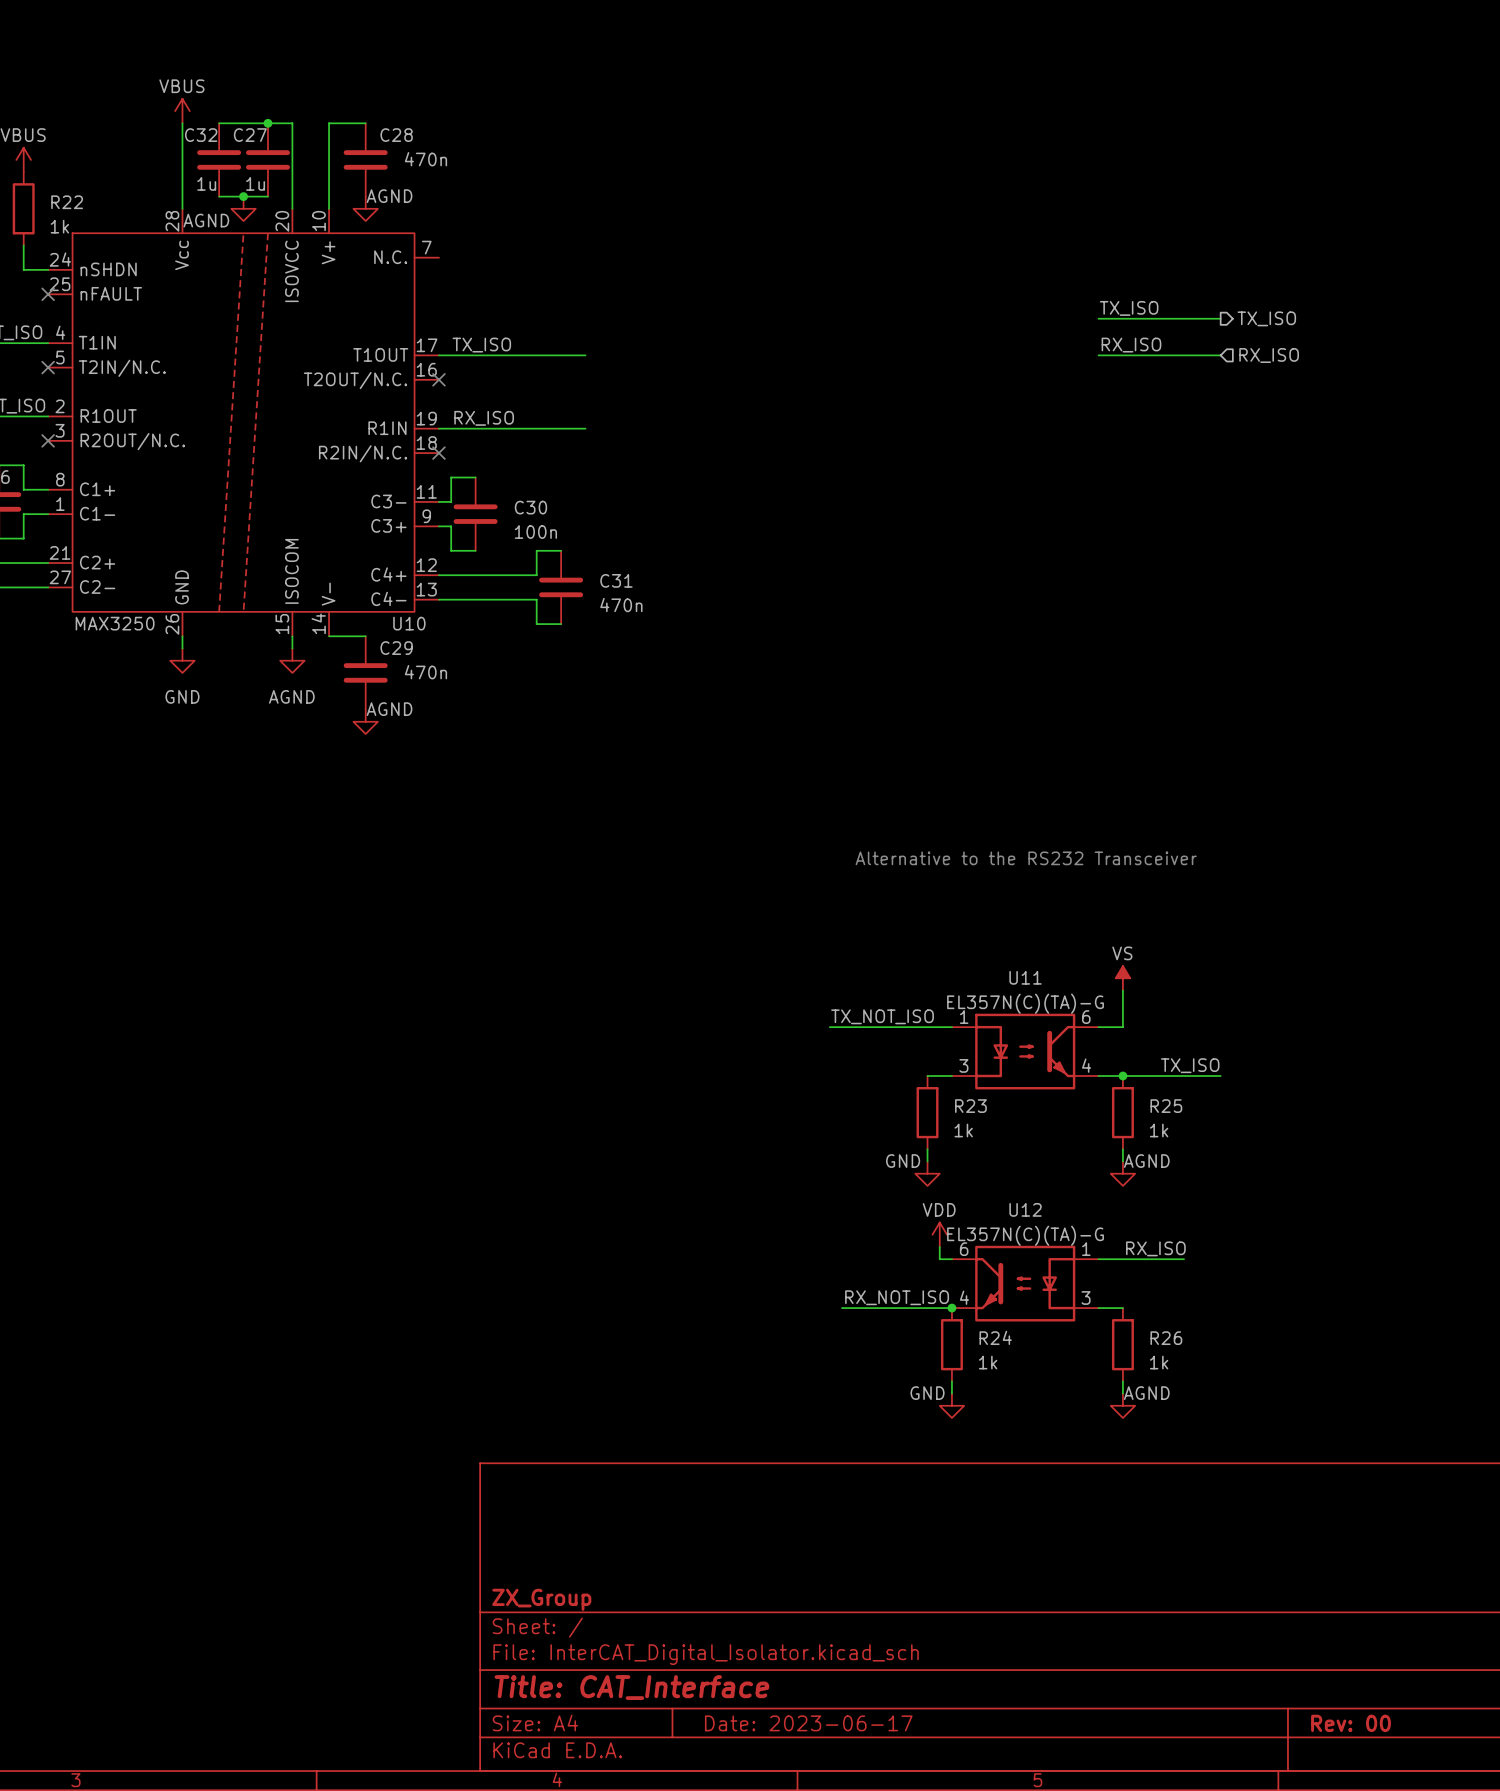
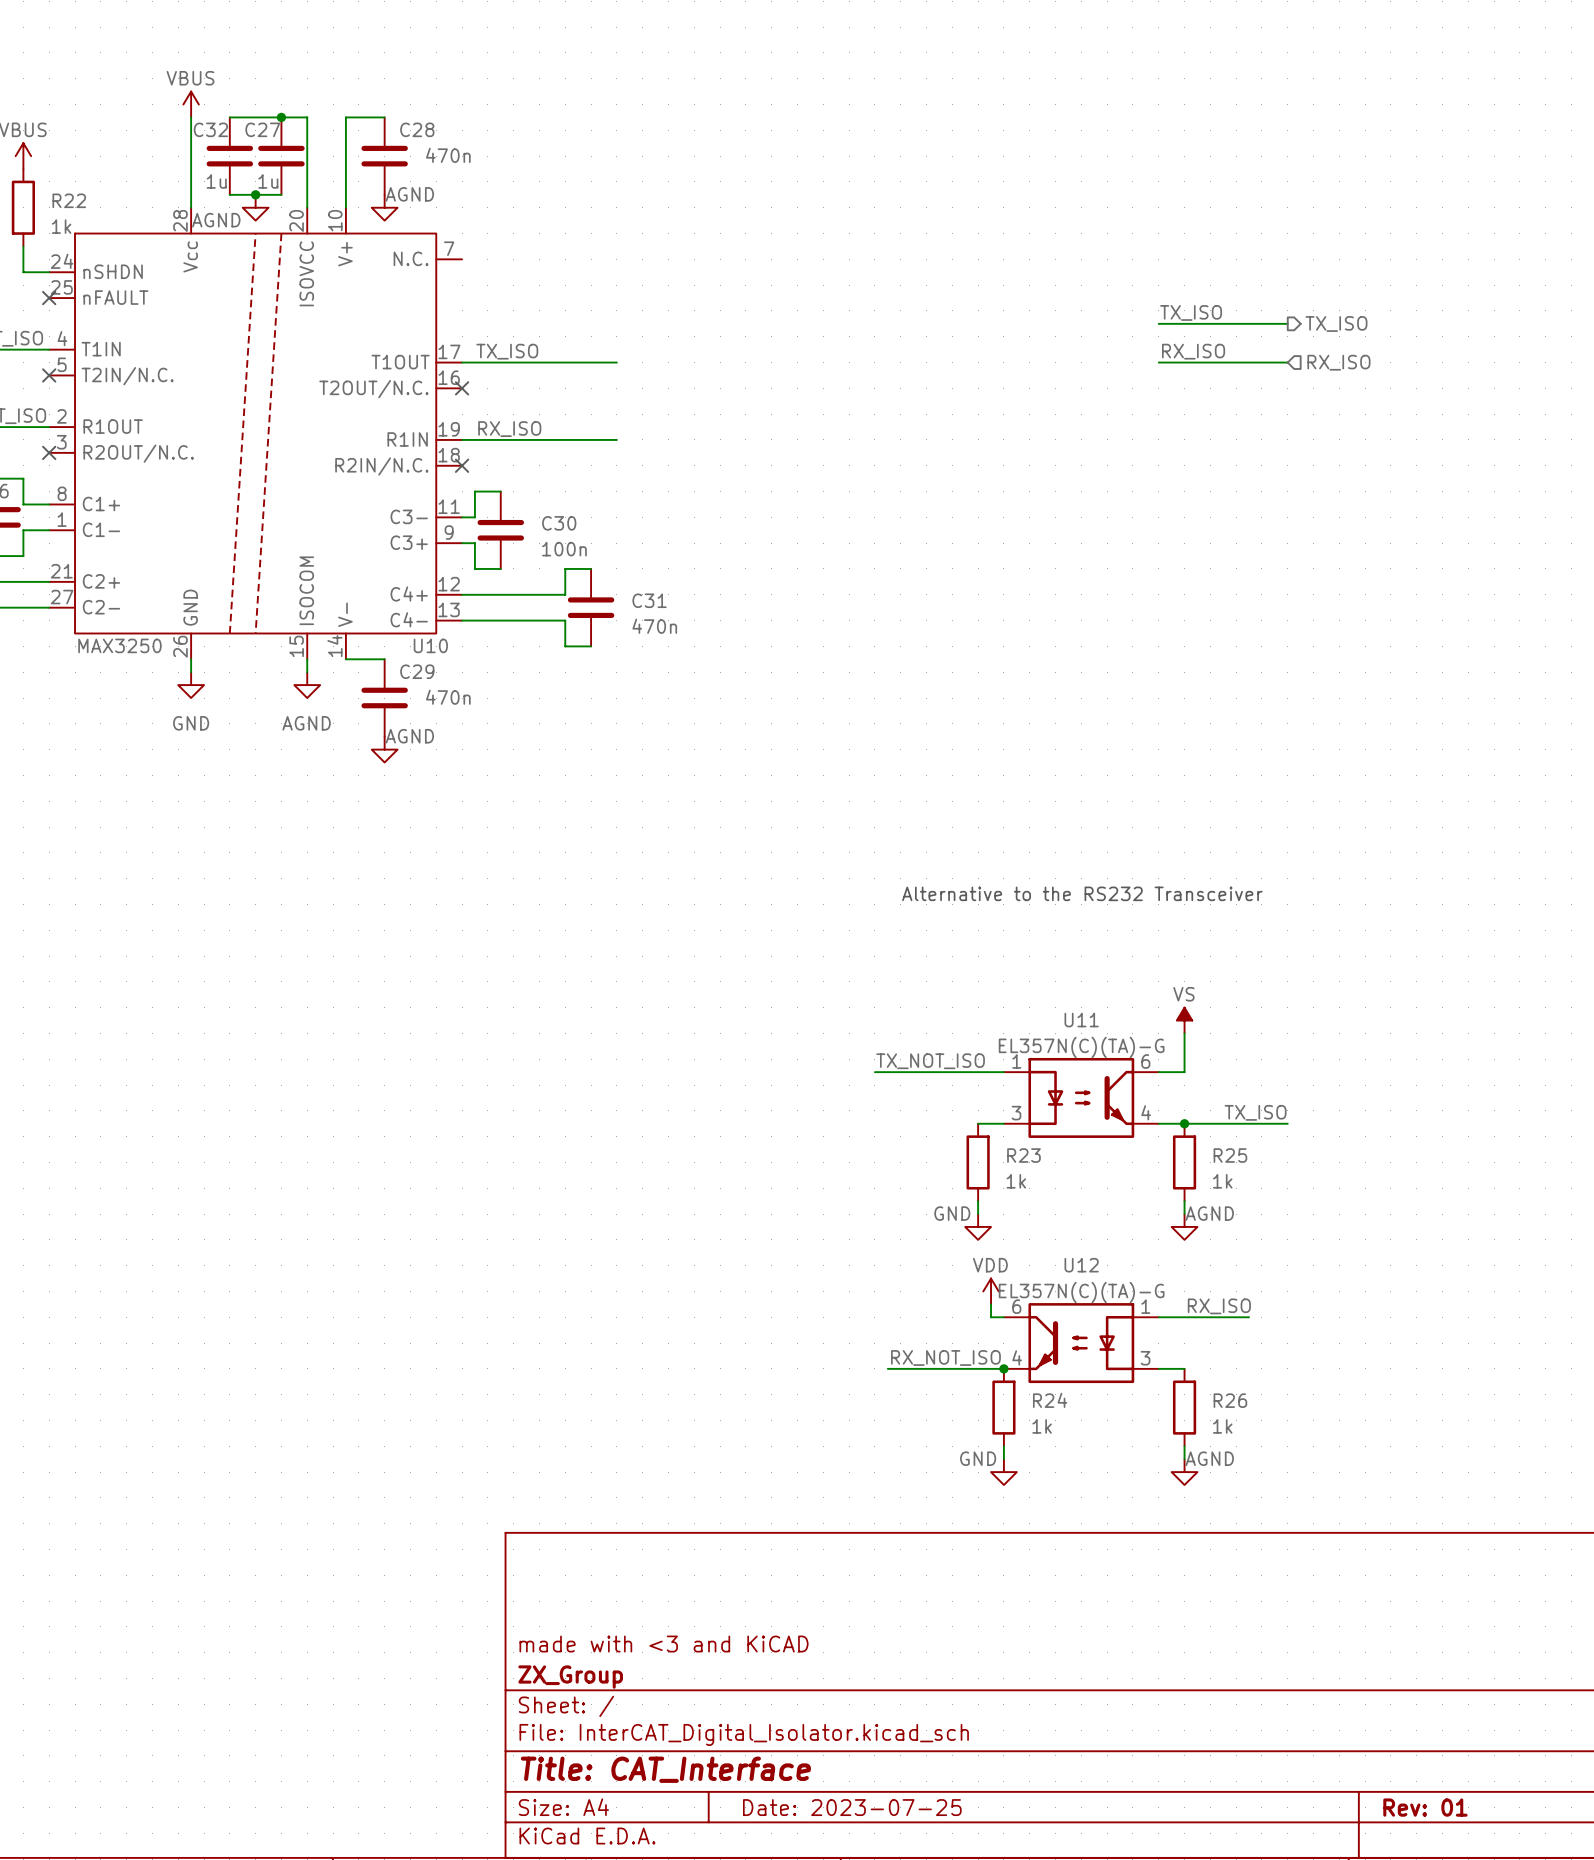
title block: none -> made with <3 and KiCAD (664, 1644)
title block: Date: 2023-06-17 (808, 1723) -> Date: 2023-07-25 (852, 1807)
title block: Rev: 00 (1351, 1723) -> Rev: 01 (1425, 1807)

